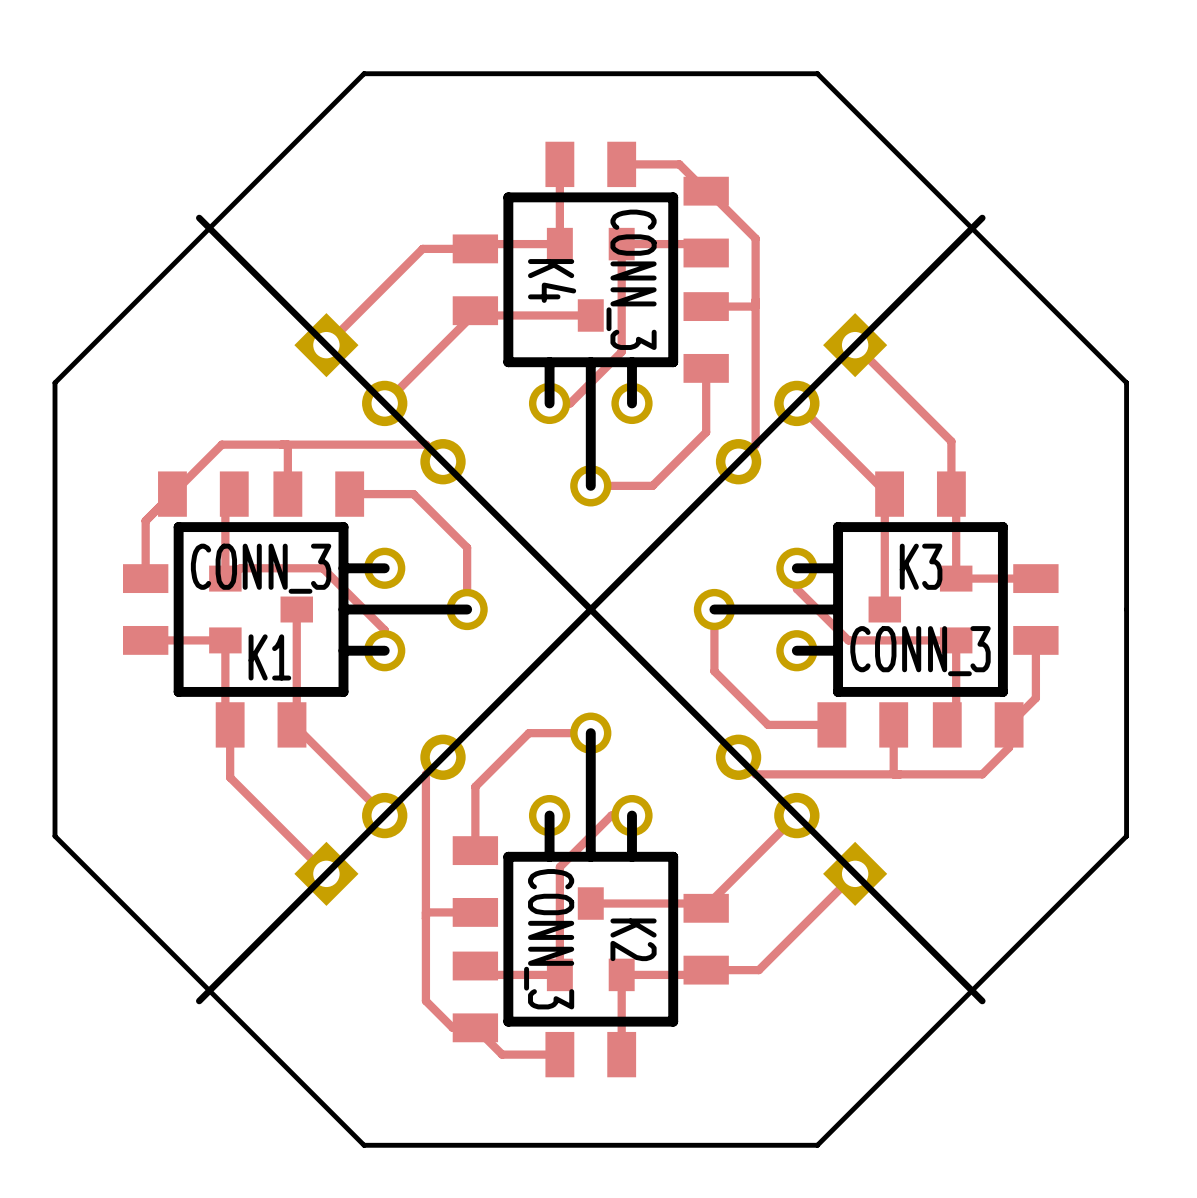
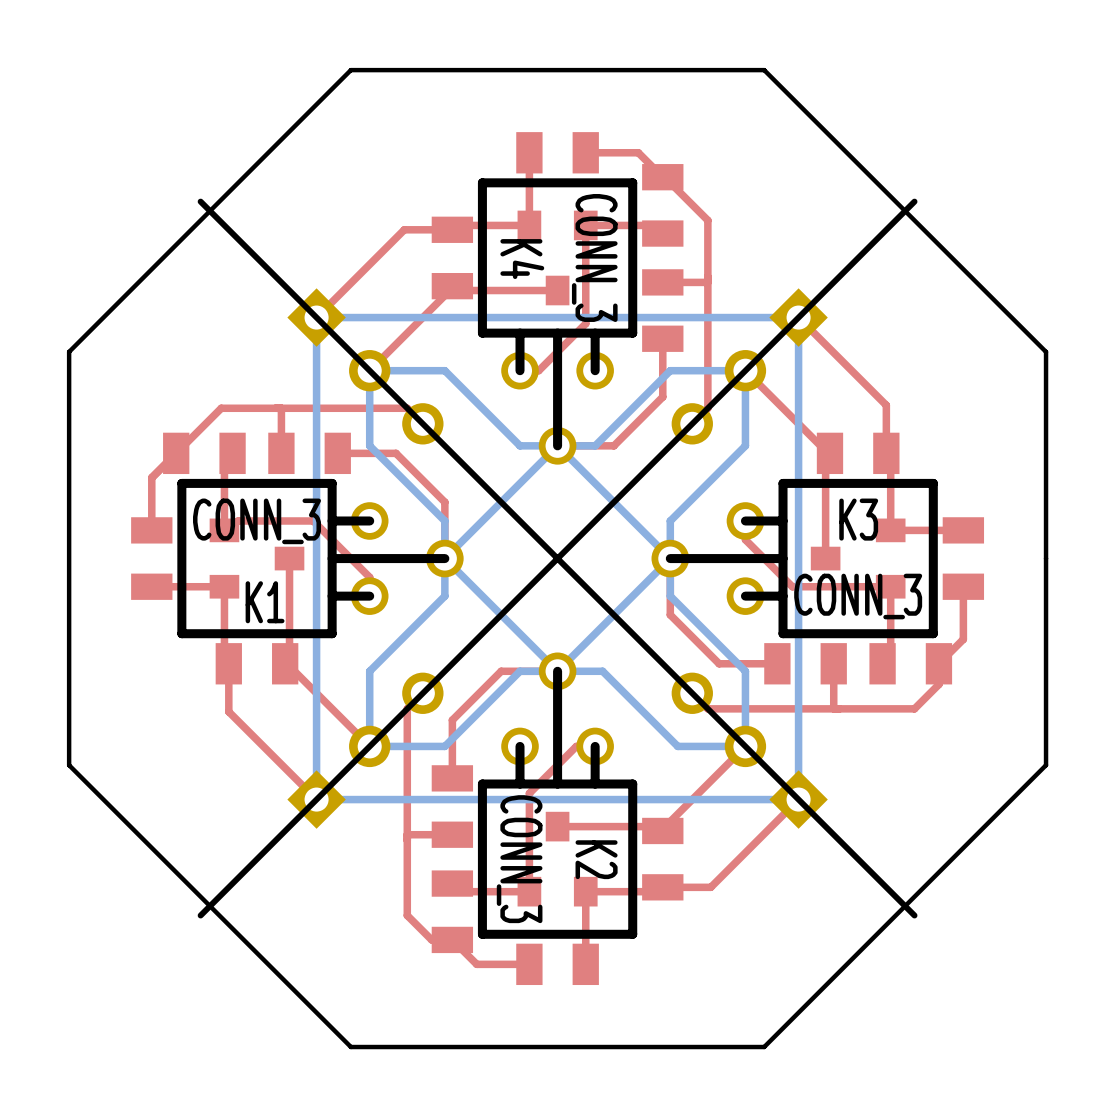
bottom track: none -> (798, 317) (316, 317) (316, 799) (798, 799) (798, 317)
bottom track: none -> (745, 370) (670, 370) (595, 445) (520, 445) (444, 370) (369, 370) (369, 445) (444, 520) (444, 596) (369, 671) (369, 746) (444, 746) (520, 671) (602, 671) (677, 746) (745, 746) (745, 671) (670, 596) (670, 520) (745, 445) (745, 370)
bottom track: none -> (557, 445) (444, 558) (557, 671) (670, 558) (557, 445)

